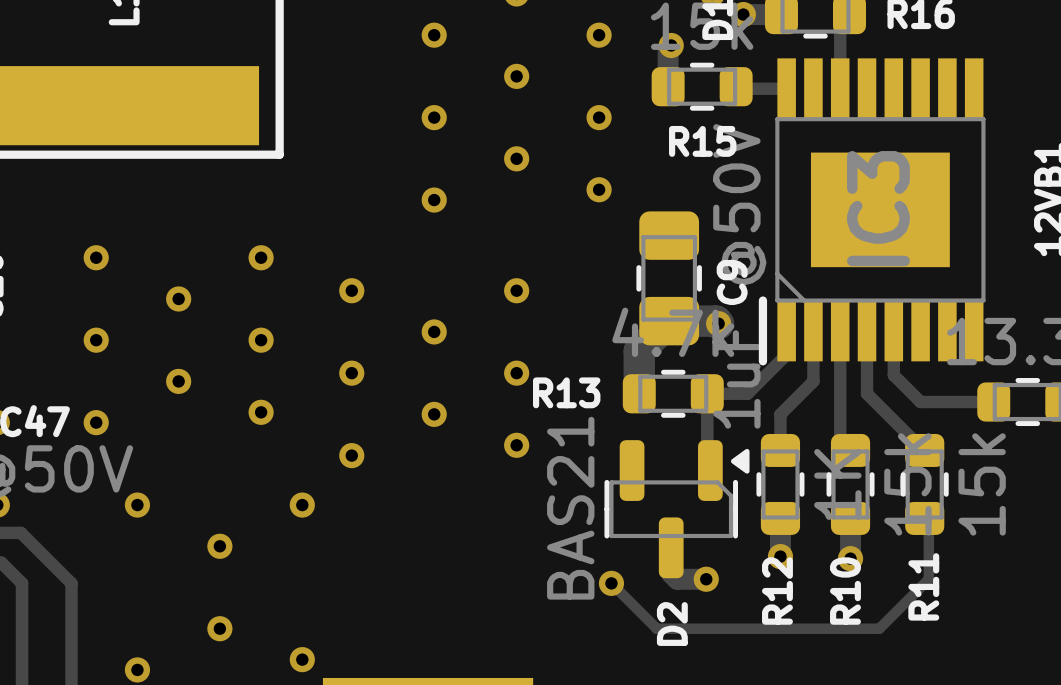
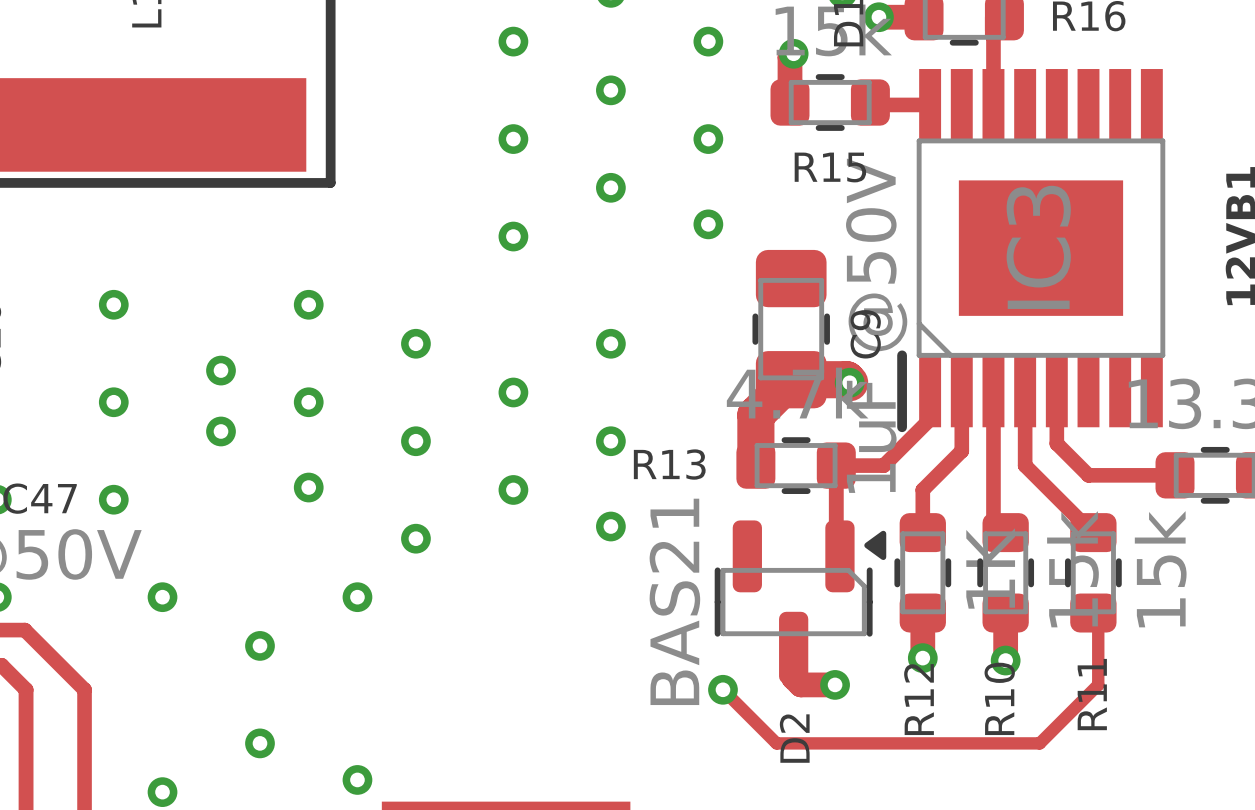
via position: (178, 298) -> (221, 370)
via position: (178, 381) -> (221, 431)

